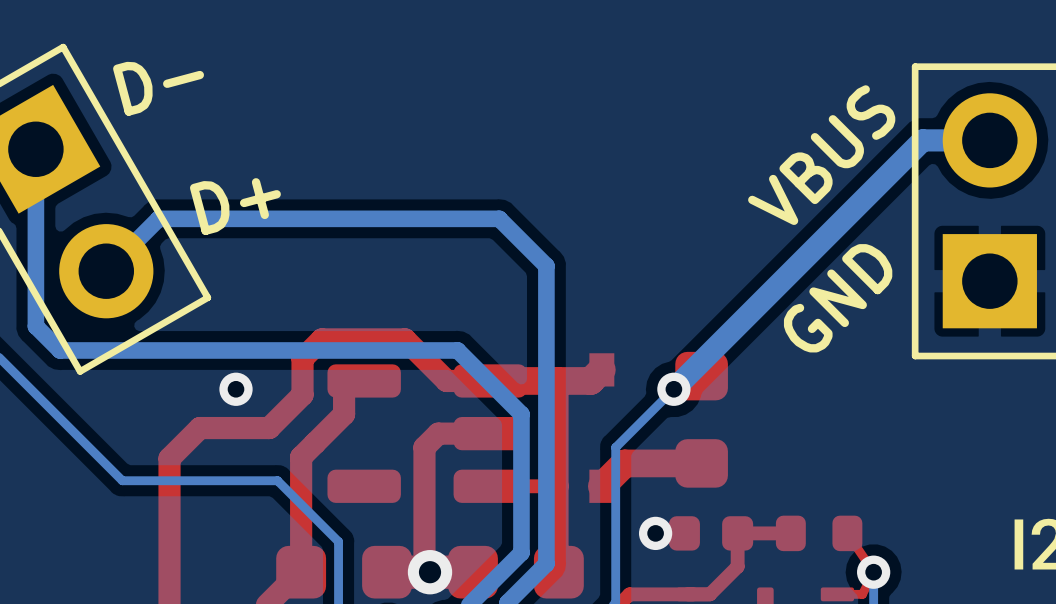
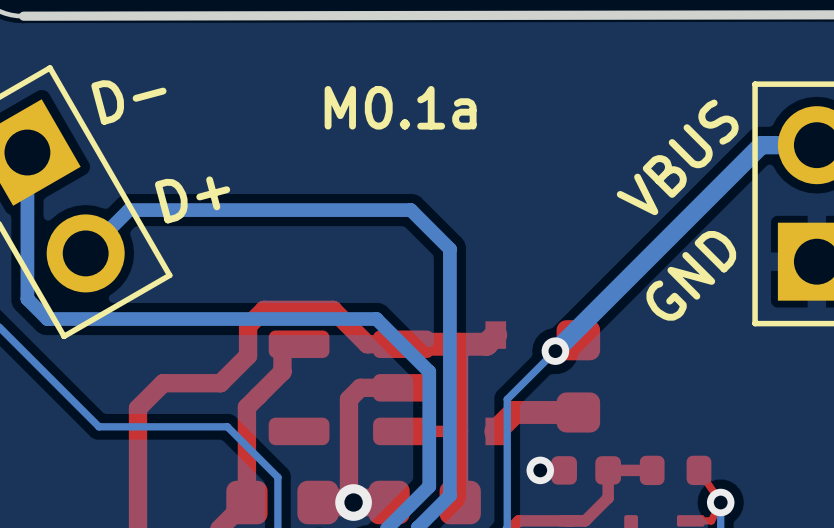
text: none -> M0.1a (400, 107)
via: (236, 389) -> none

